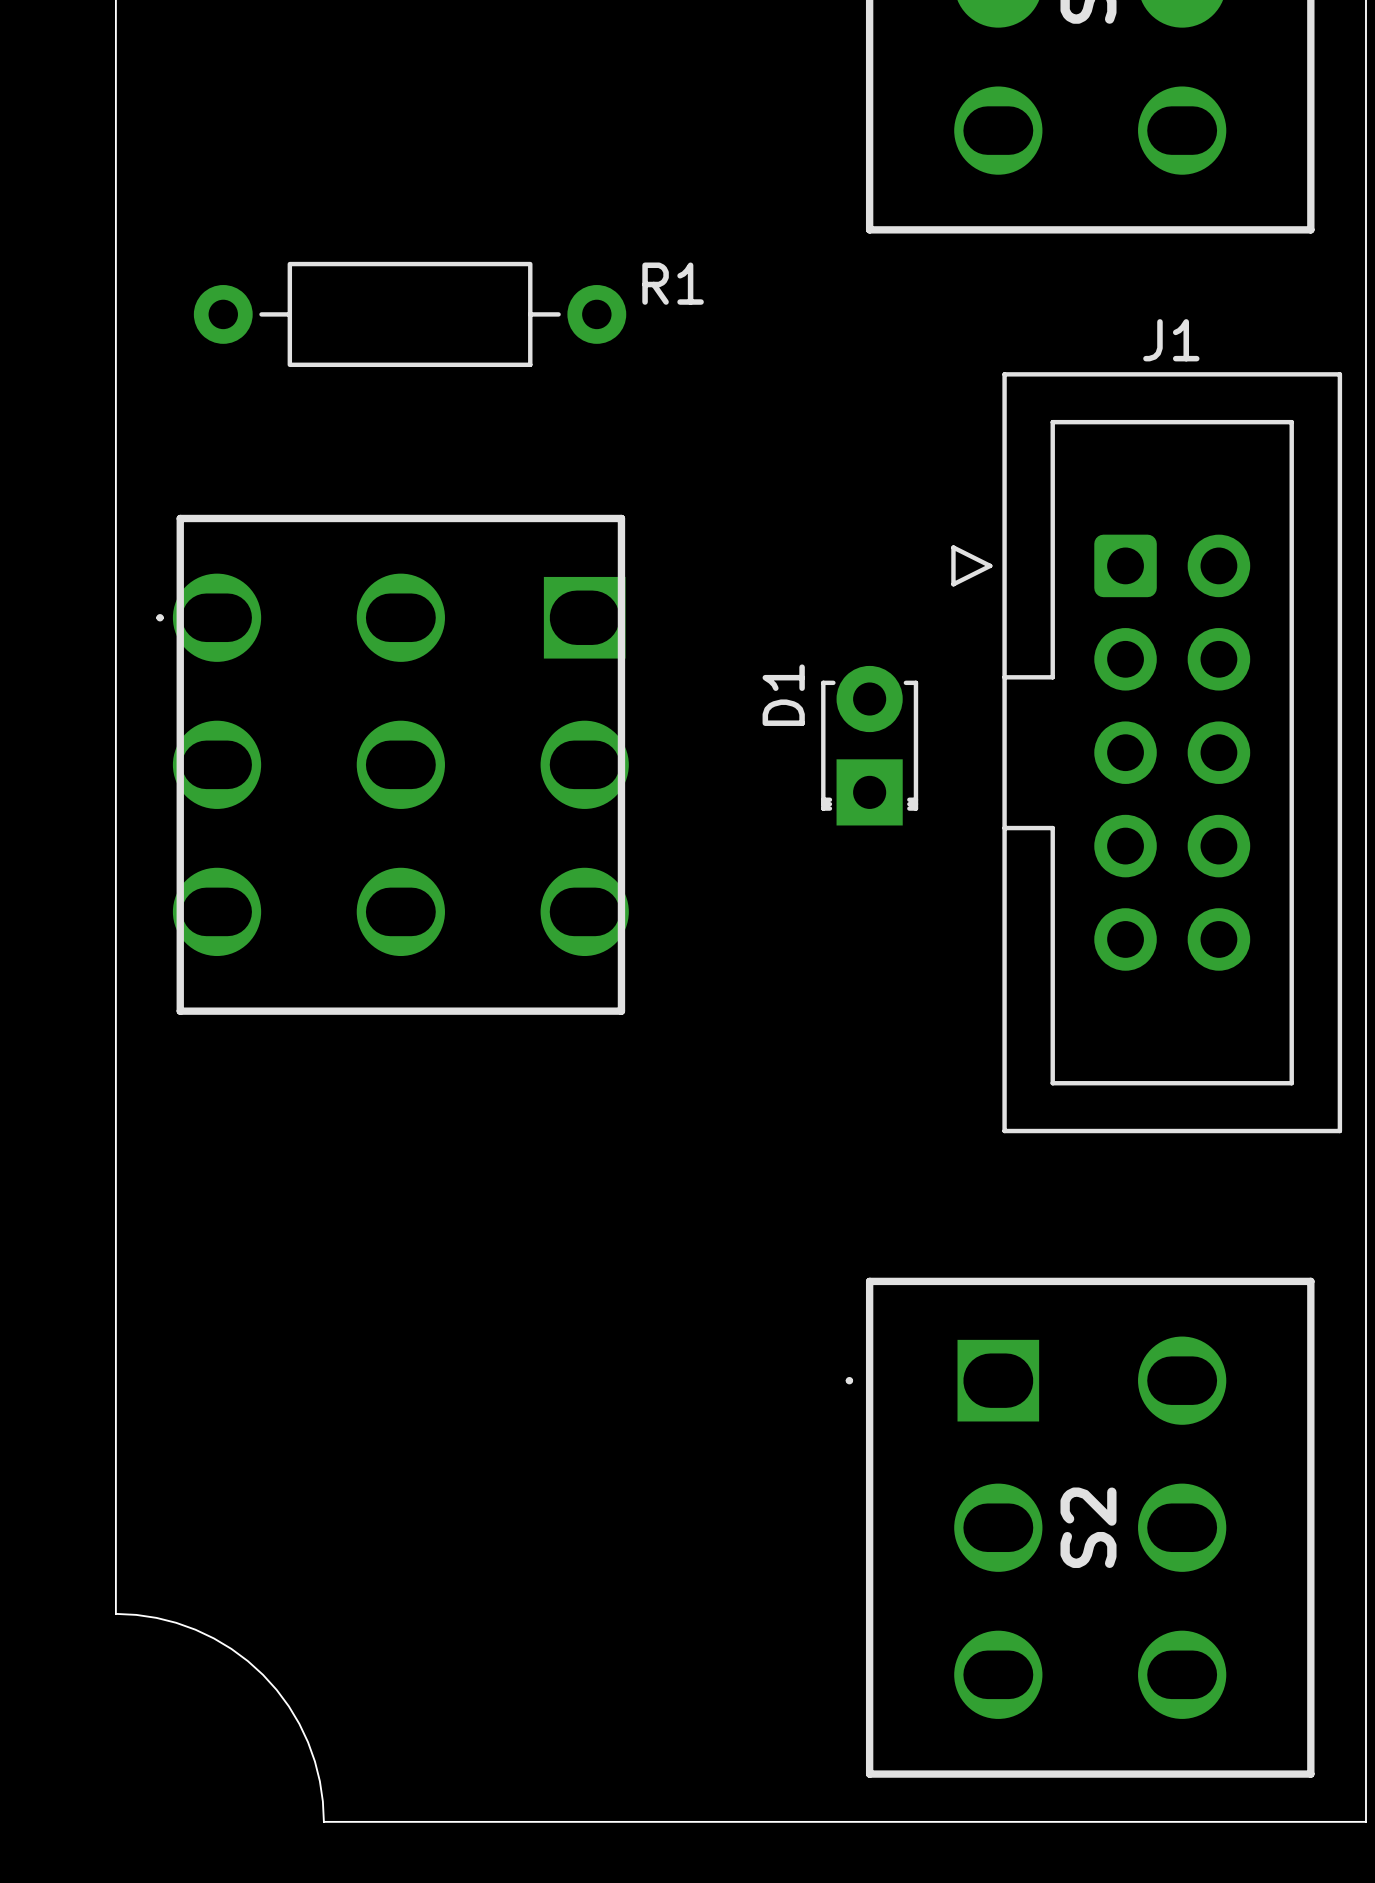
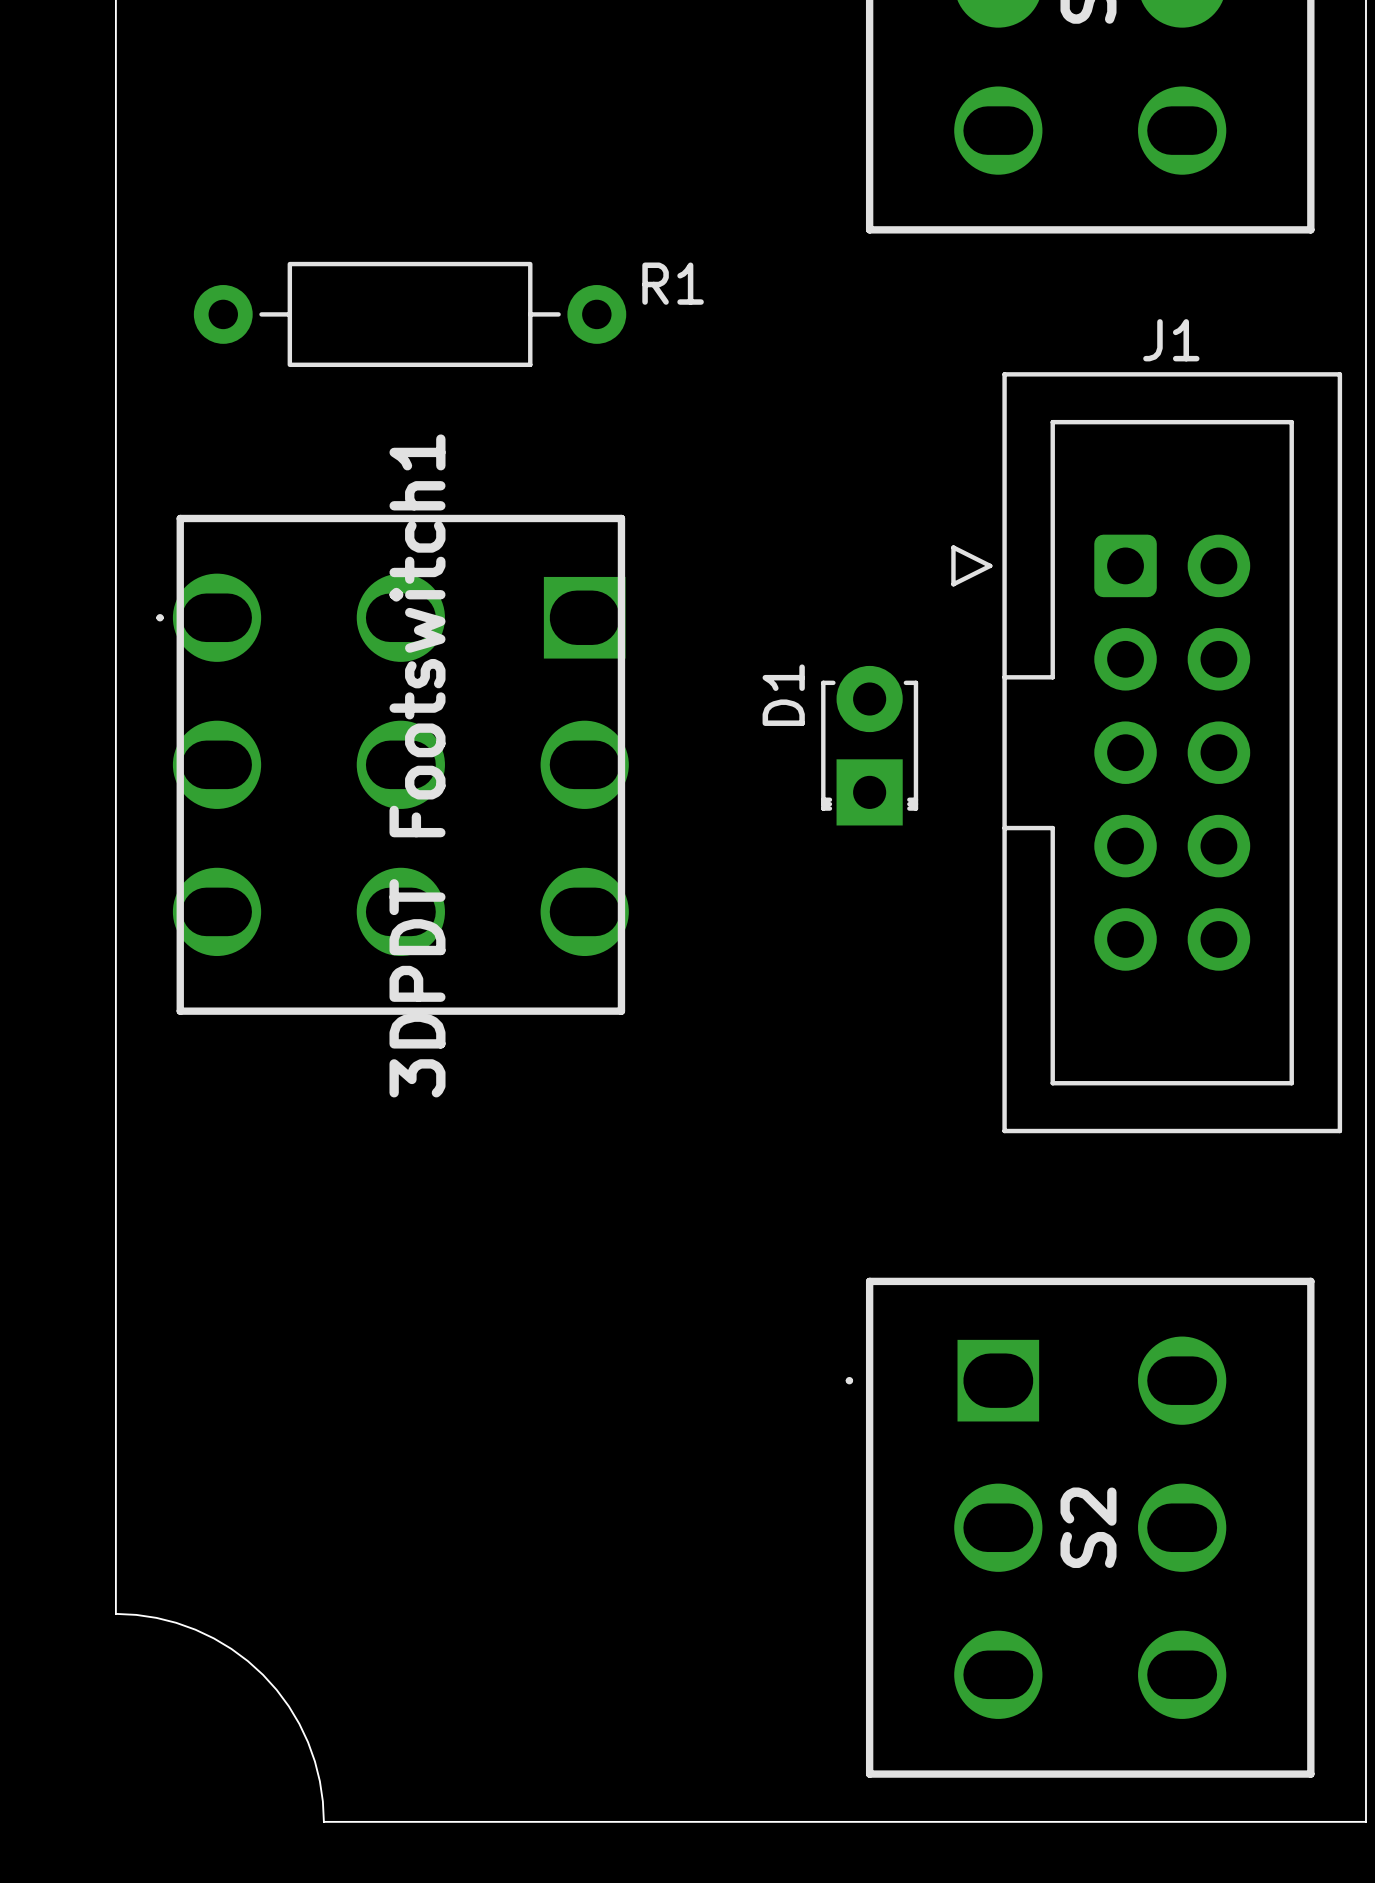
3DPDT Footswitch1 name: none -> 3DPDT Footswitch1 (417, 765)

